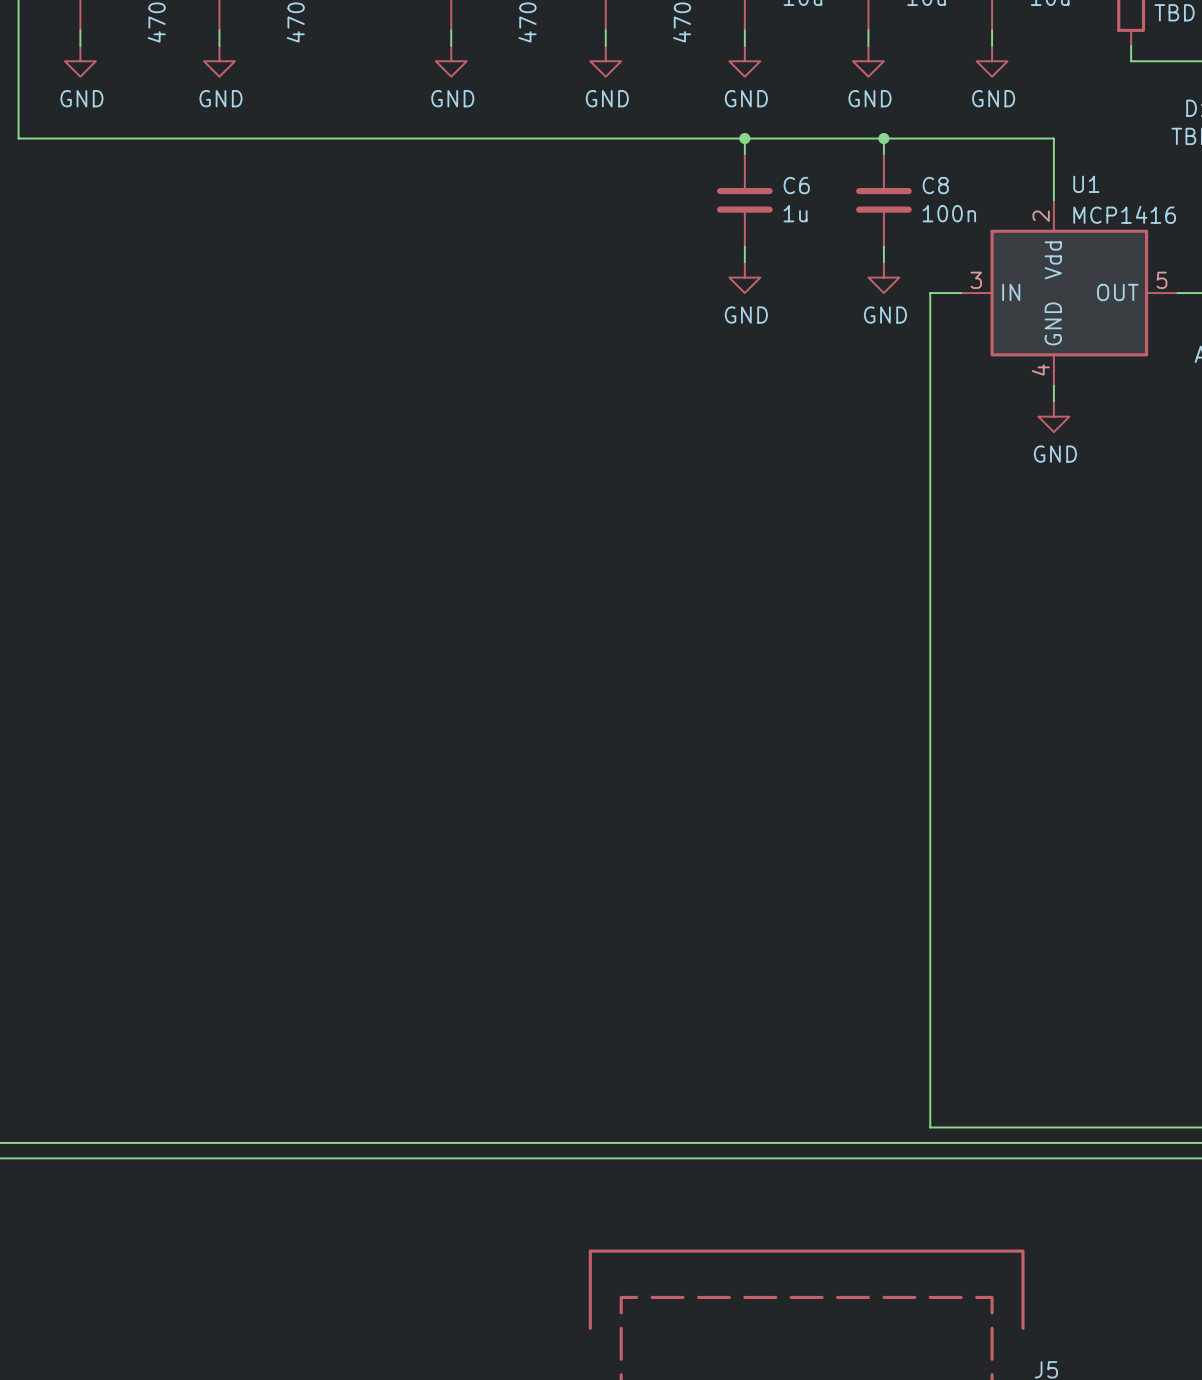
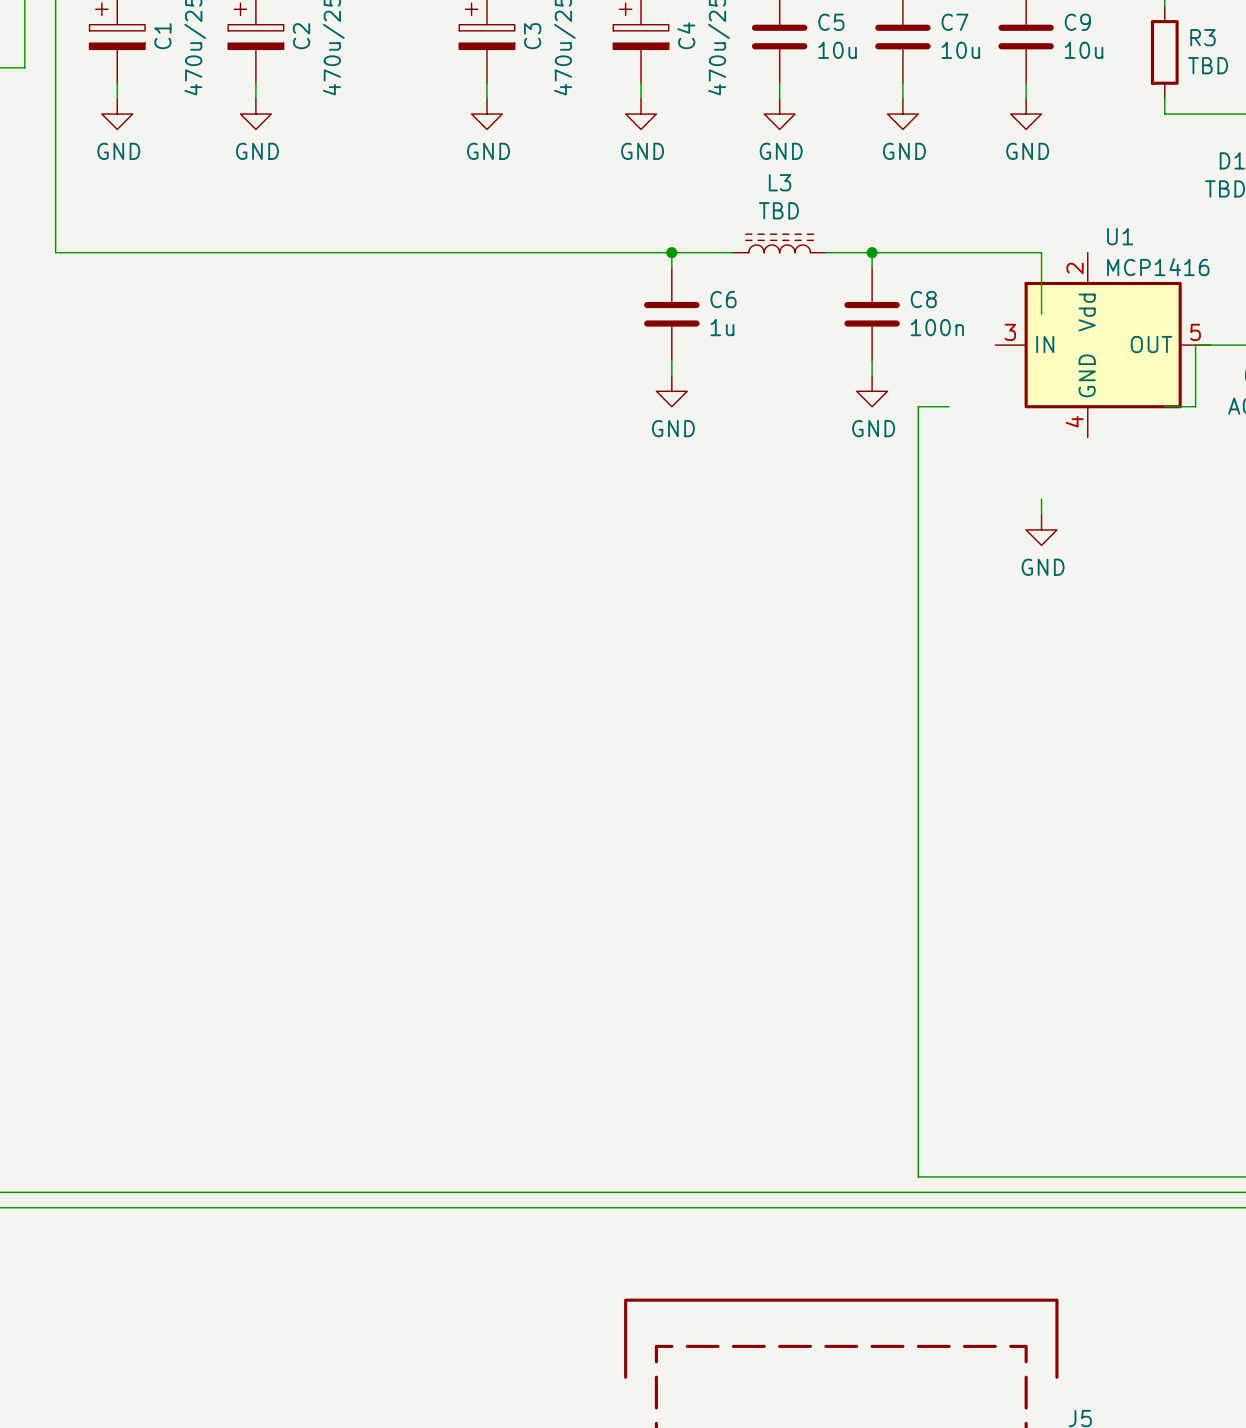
wire: (18, 138) (1053, 138) (1053, 200) -> (55, 191) (55, 252) (733, 252)
wire: (744, 138) (744, 153) -> (671, 252) (671, 268)
junction: (744, 138) -> none
wire: (883, 138) (883, 153) -> (872, 252) (872, 268)
junction: (883, 138) -> none
L3: none -> TBD (779, 243)
junction: none -> (671, 252)
C6 position: (744, 200) -> (671, 314)
wire: none -> (825, 252) (1041, 252) (1041, 314)
junction: none -> (872, 252)
C8 position: (883, 200) -> (872, 314)
wire: (744, 246) (744, 262) -> (671, 360) (671, 375)
wire: (883, 246) (883, 262) -> (872, 360) (872, 375)
power symbol: GND (744, 277) -> none
power symbol: GND (883, 277) -> none
wire: (961, 293) (930, 293) (930, 1127) -> (949, 406) (918, 406) (918, 1176) (964, 1176)
wire: none -> (1210, 345) (1195, 345) (1195, 406) (1164, 406)
power symbol: none -> GND (671, 391)
power symbol: none -> GND (872, 391)
wire: (1053, 385) (1053, 401) -> (1041, 499) (1041, 514)
power symbol position: GND (1053, 416) -> GND (1041, 529)

